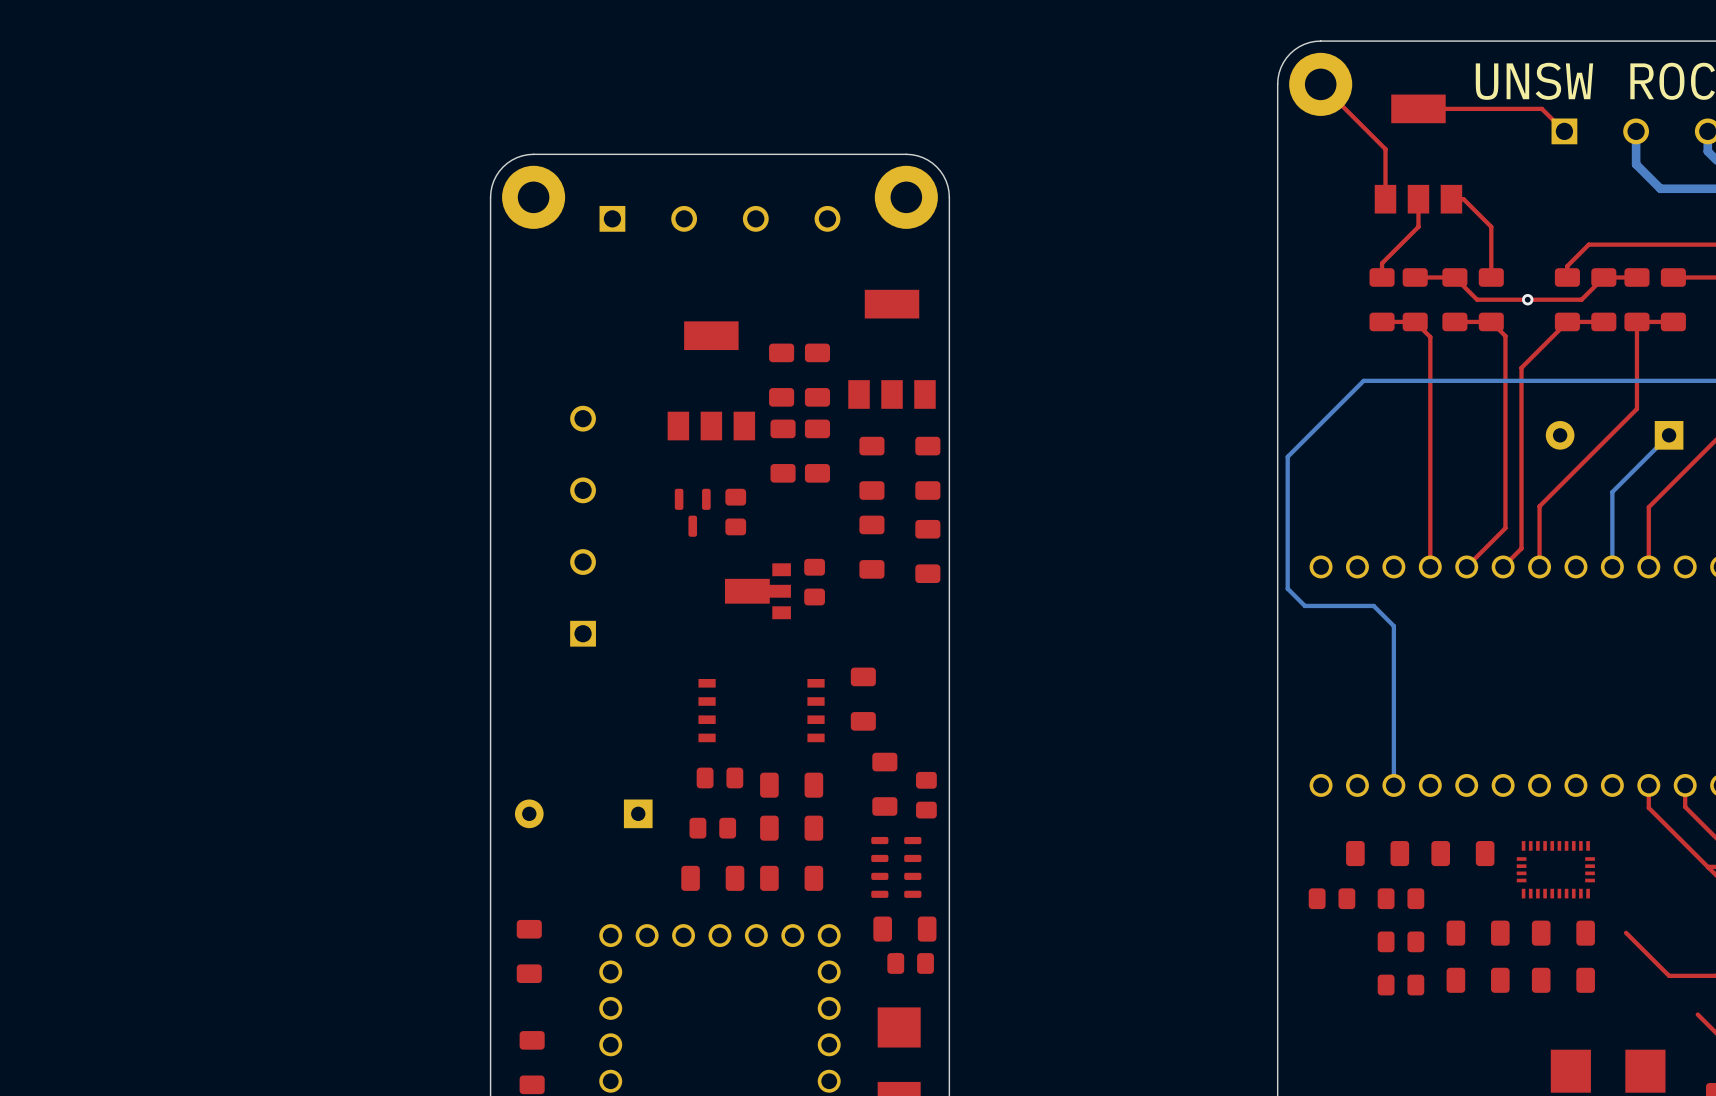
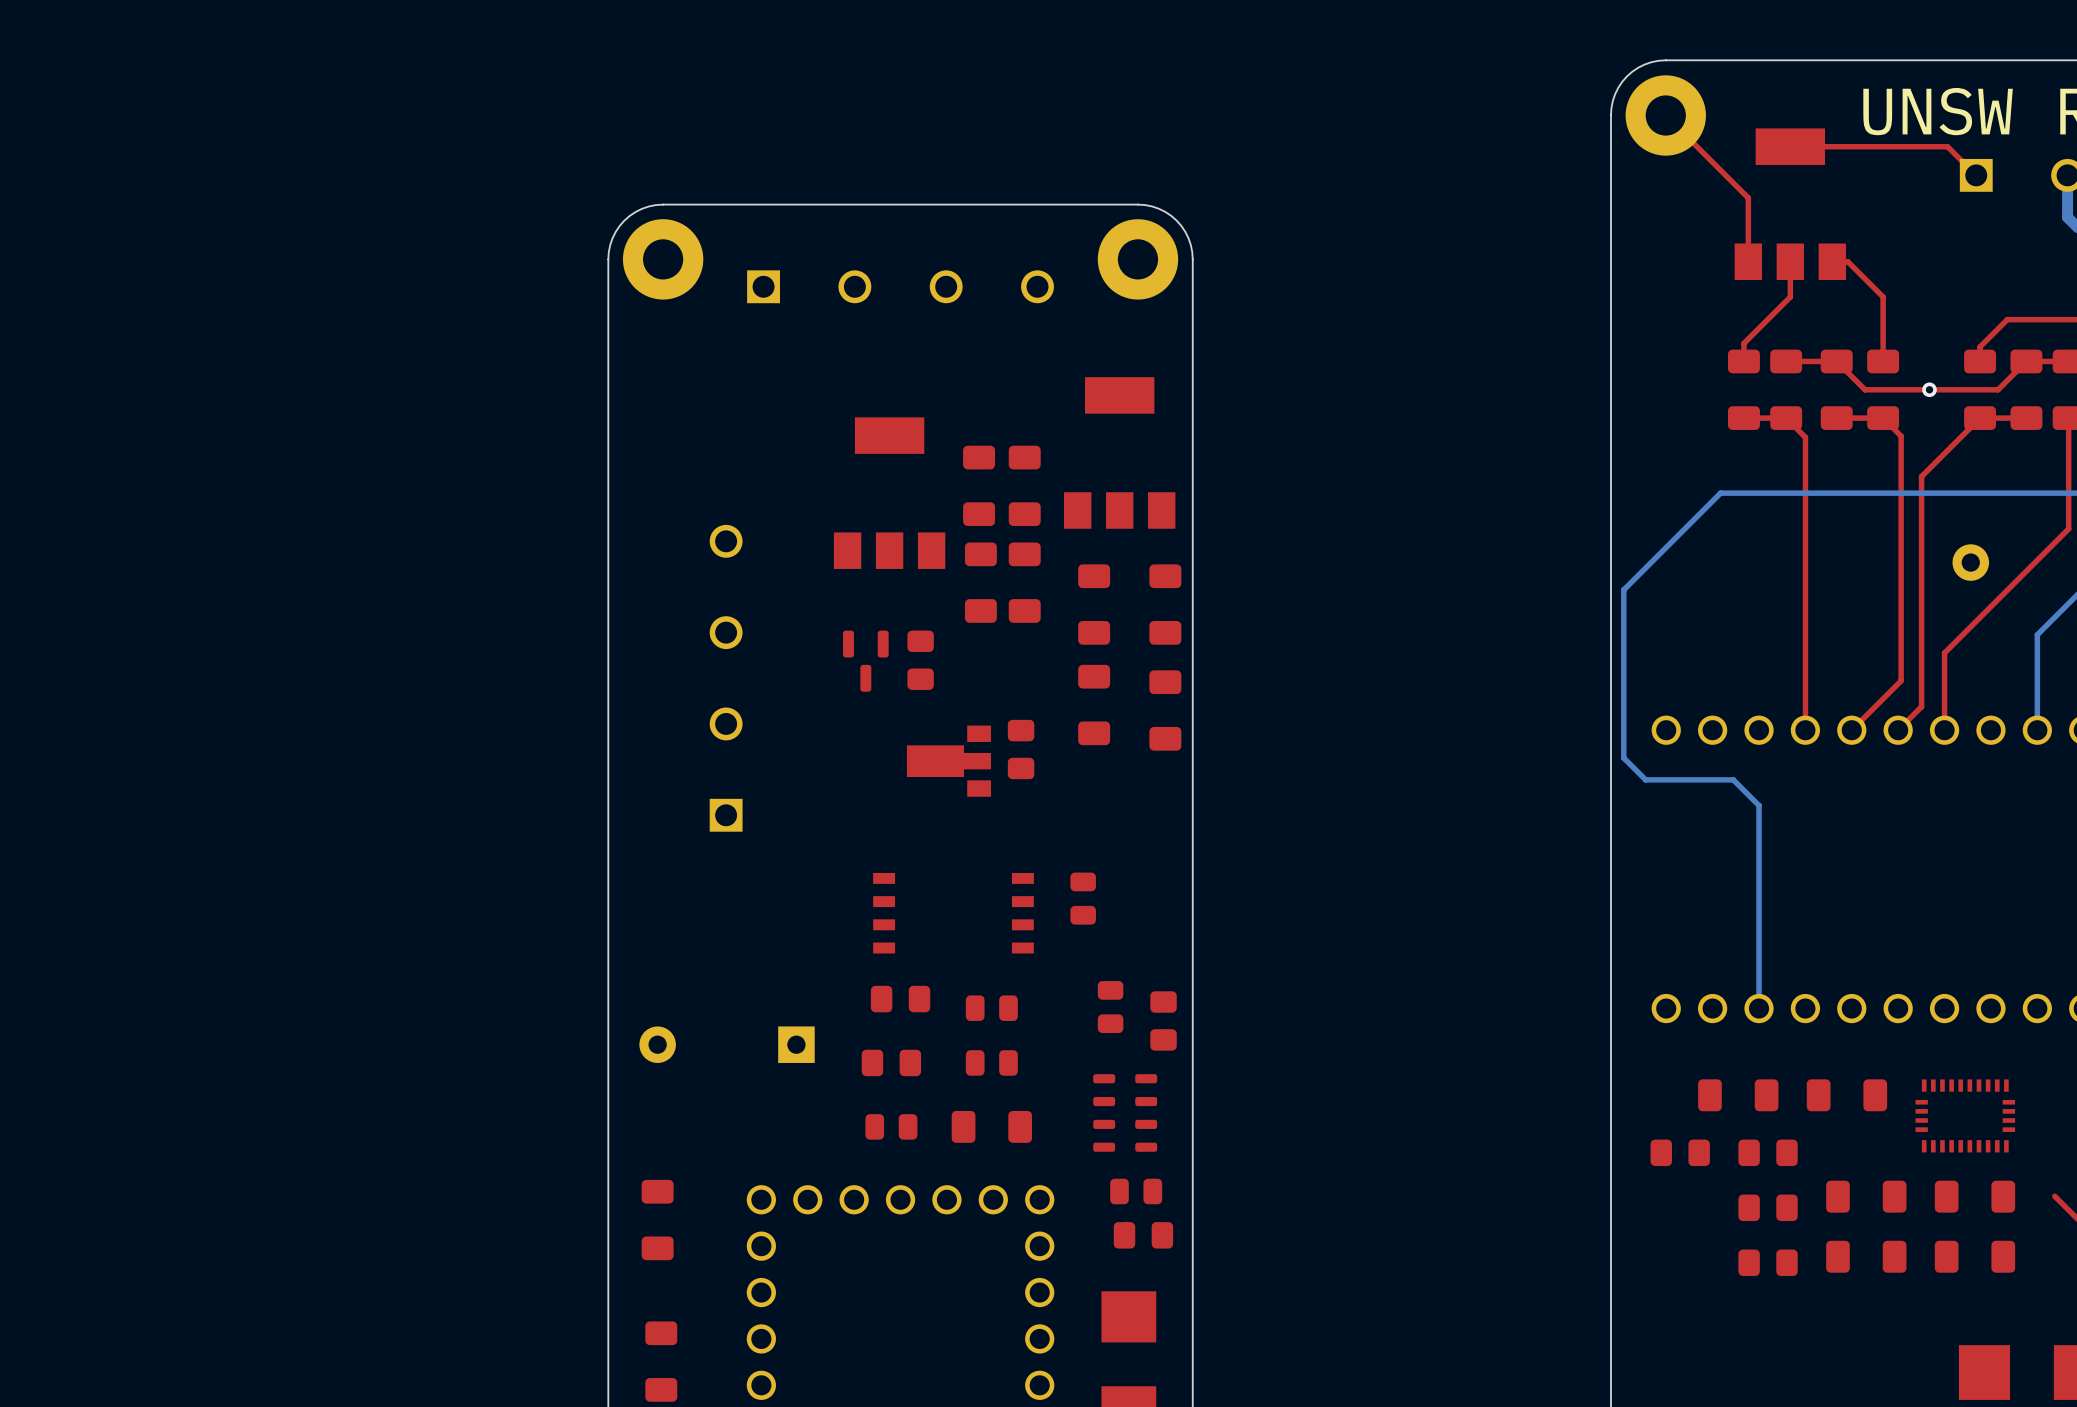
part footprint: [850, 667, 876, 731] -> [1070, 872, 1096, 925]
part footprint: [872, 752, 898, 816] -> [1097, 981, 1124, 1034]
part footprint: [760, 772, 824, 798] -> [965, 995, 1018, 1021]
part footprint: [760, 815, 824, 841] -> [965, 1050, 1018, 1076]
part footprint: [681, 865, 745, 891] -> [865, 1114, 918, 1140]
part footprint: [873, 916, 937, 942] -> [1110, 1178, 1163, 1205]

